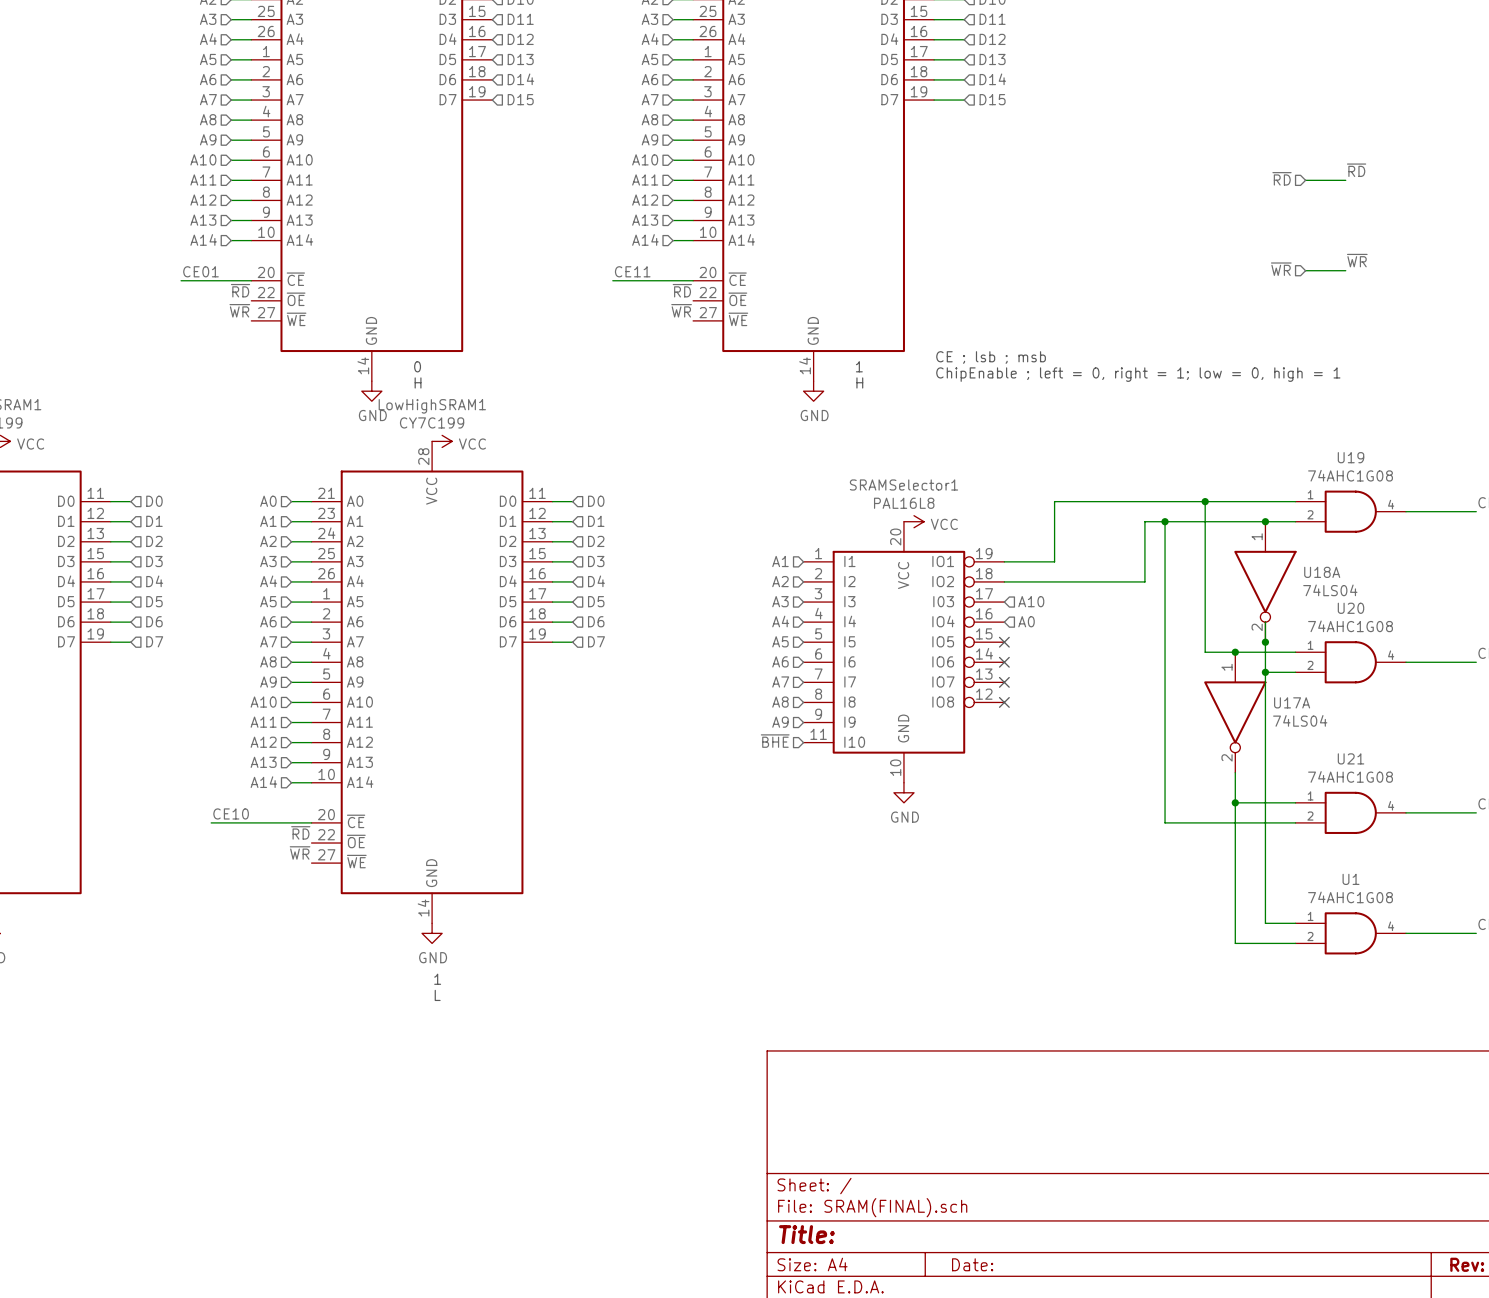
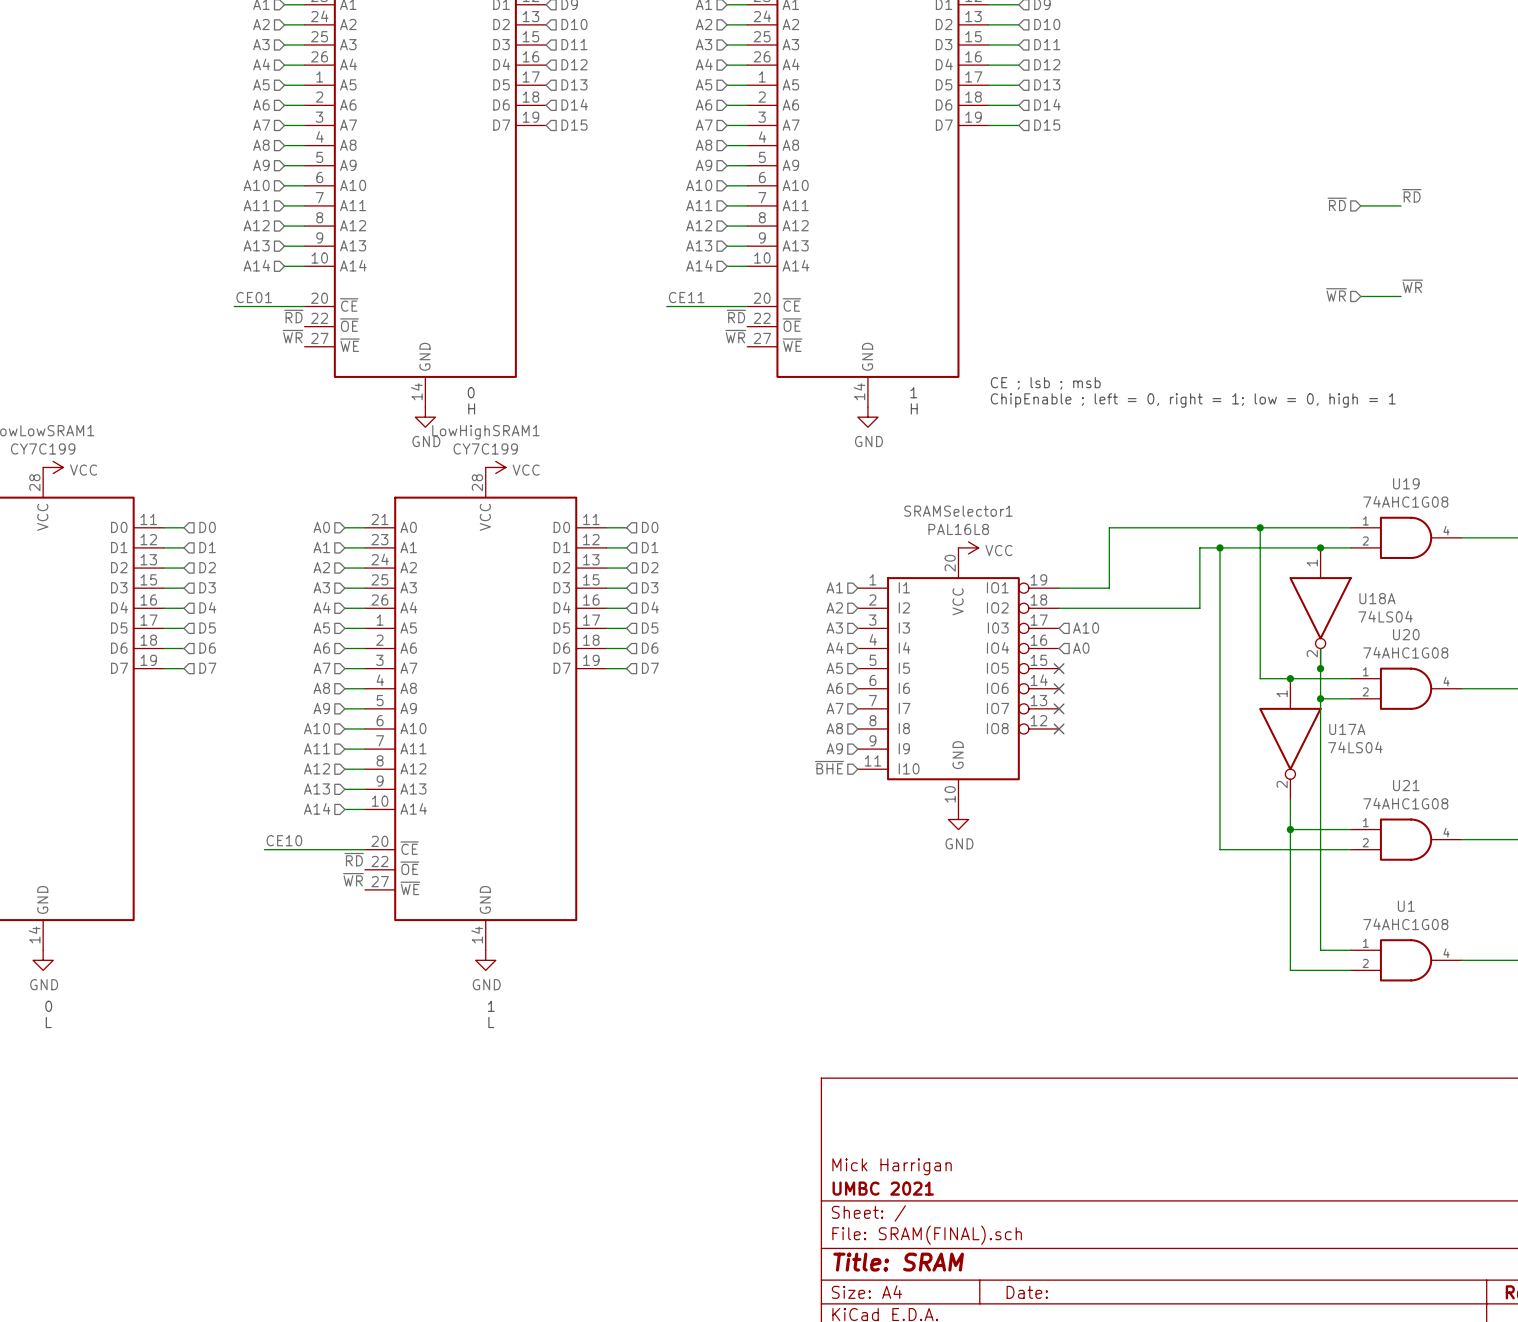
title block: none -> Mick Harrigan (892, 1166)
title block: none -> UMBC 2021 (883, 1188)
title block: Title: (806, 1234) -> Title: SRAM (898, 1262)

